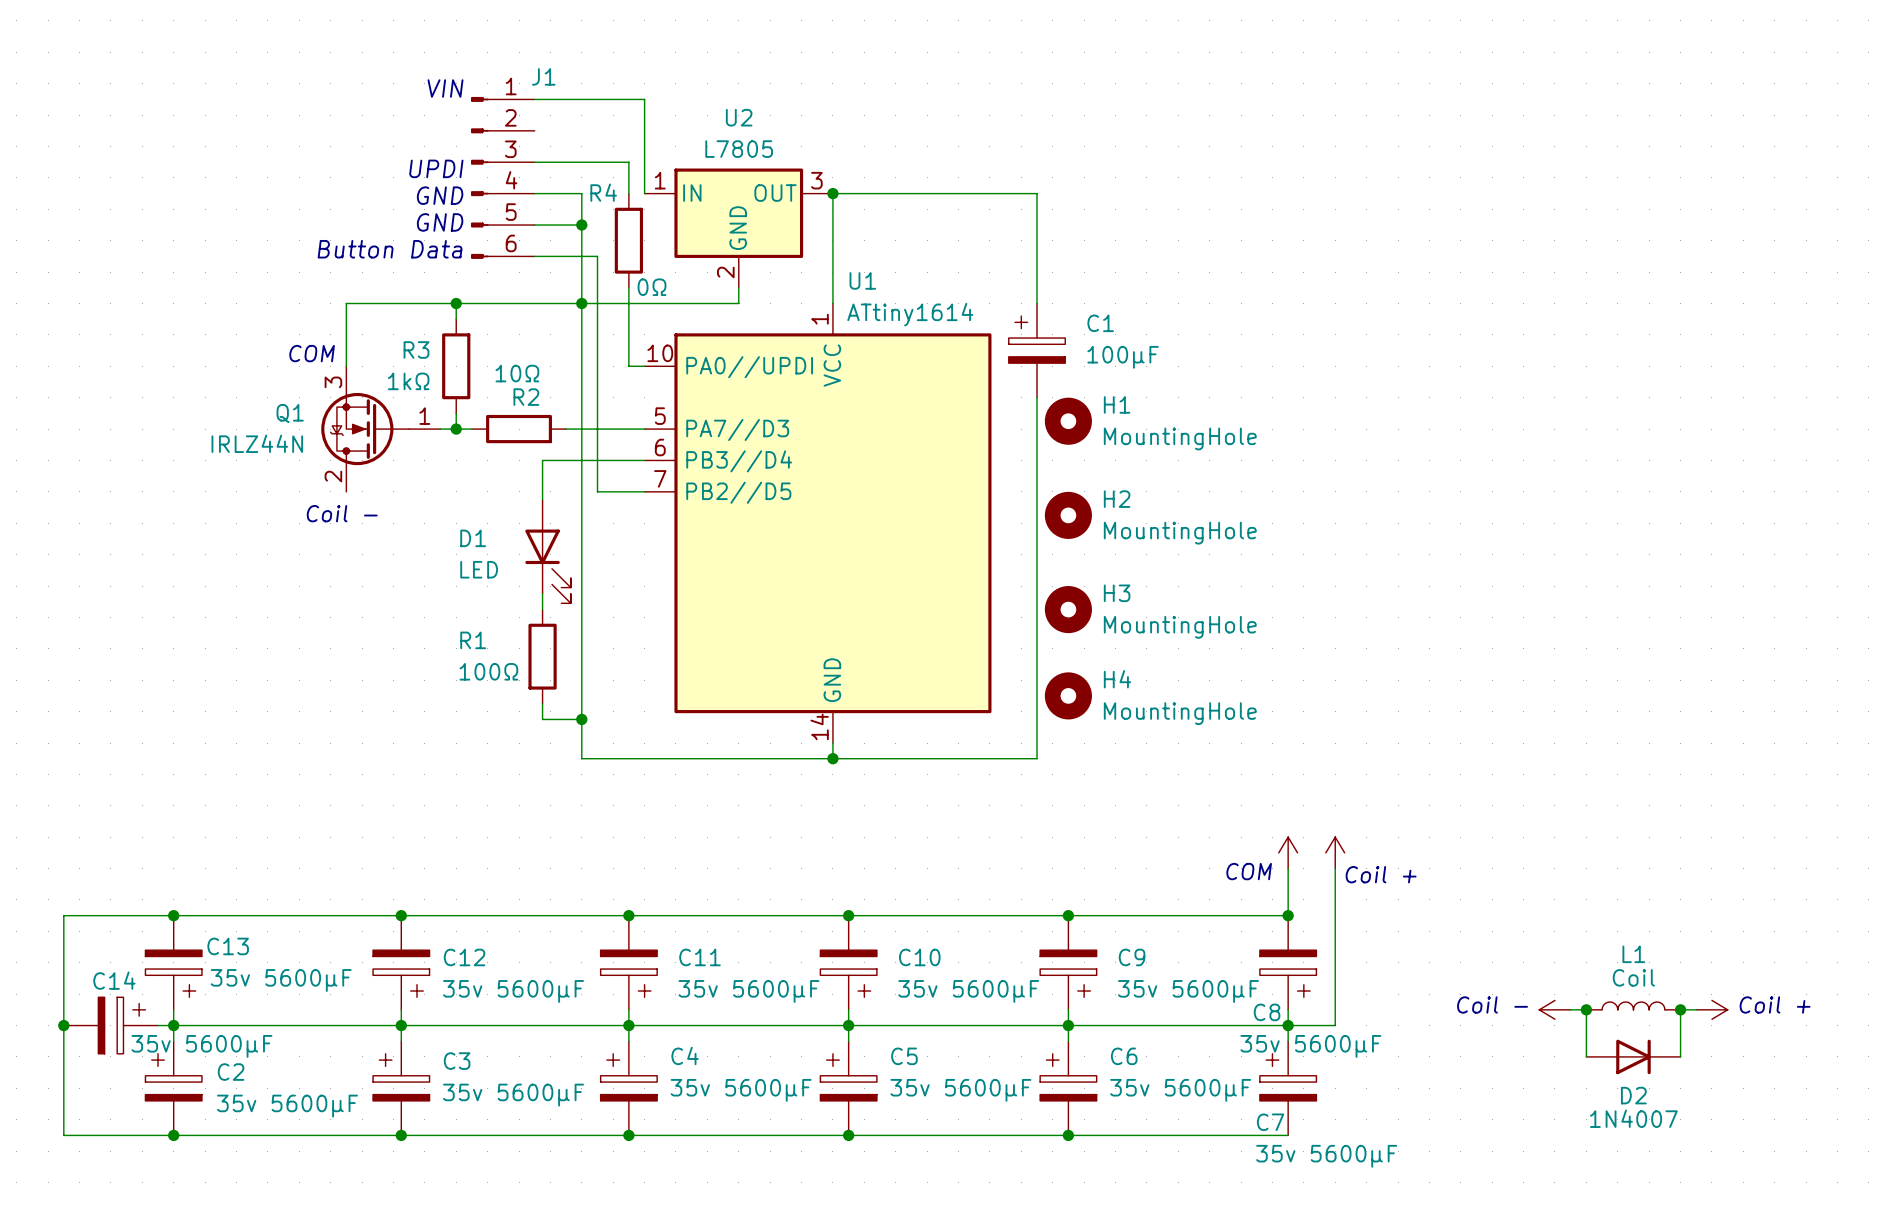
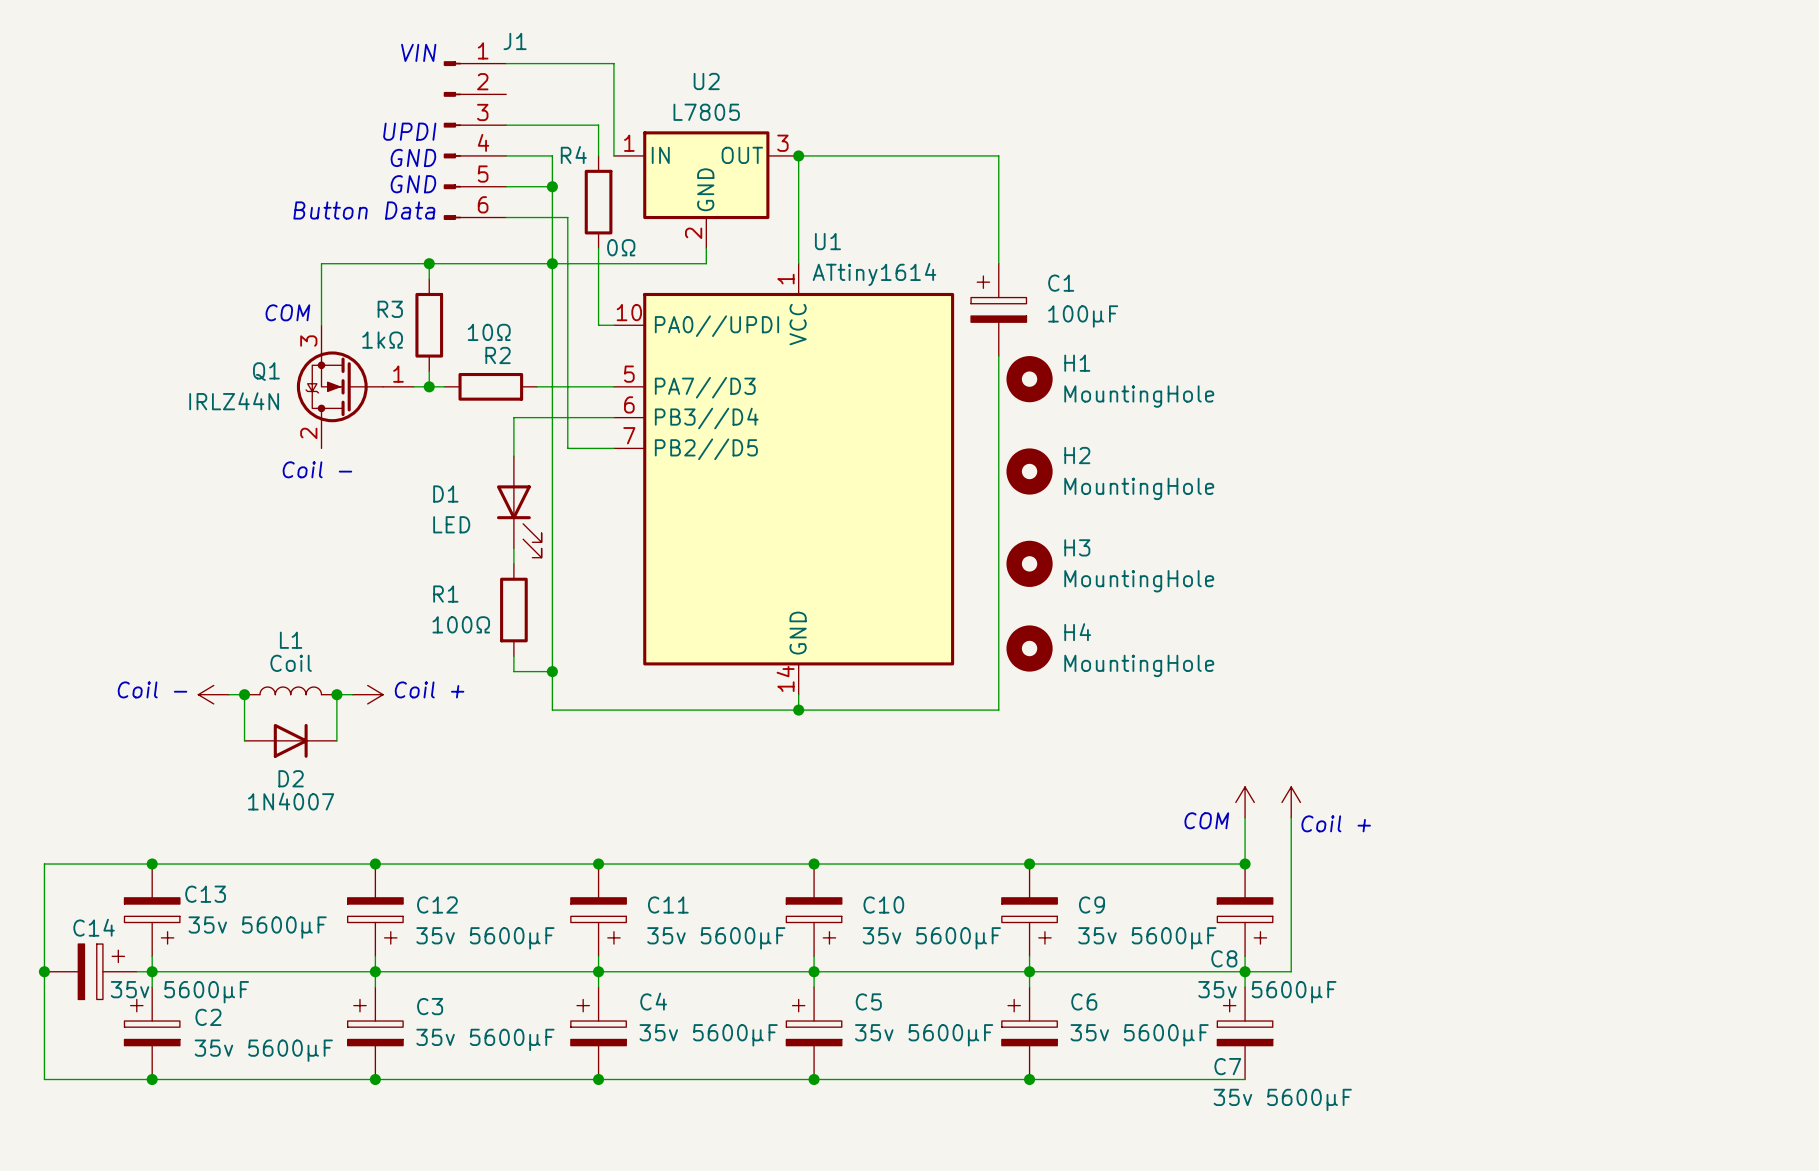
text: none -> Coil - (152, 689)
text: none -> Coil + (429, 689)
power symbol: none -> (213, 694)
wire: none -> (229, 694) (244, 694) (244, 740)
junction: none -> (244, 694)
junction: none -> (336, 694)
wire: none -> (352, 694) (336, 694) (336, 740)
power symbol: none -> (367, 694)
text: Coil - (1492, 1004) -> none
text: Coil + (1775, 1004) -> none
L1 position: (1633, 1005) -> (290, 690)
power symbol: (1554, 1009) -> none
wire: (1570, 1009) (1586, 1009) (1586, 1056) -> none
junction: (1586, 1009) -> none
junction: (1680, 1009) -> none
wire: (1696, 1009) (1680, 1009) (1680, 1056) -> none
power symbol: (1711, 1009) -> none
D2 position: (1633, 1056) -> (290, 740)

